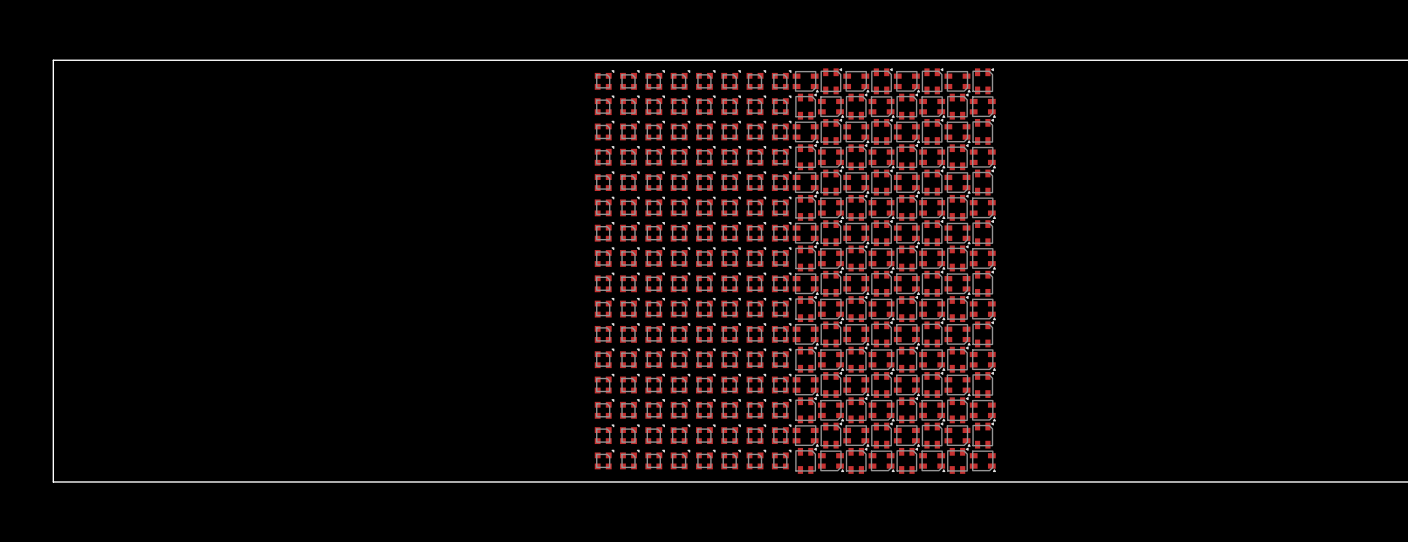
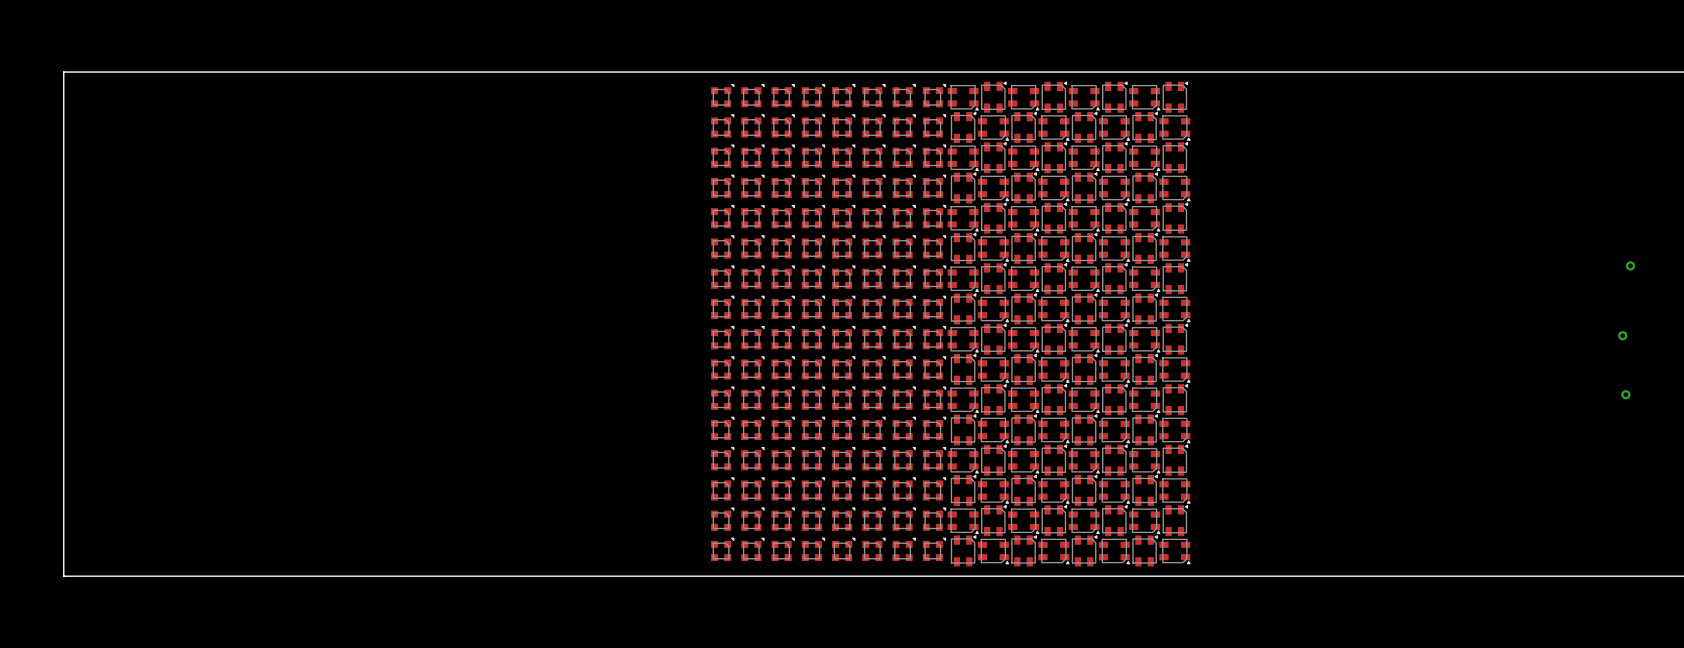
via: none -> (1630, 265)
via: none -> (1622, 335)
via: none -> (1625, 394)

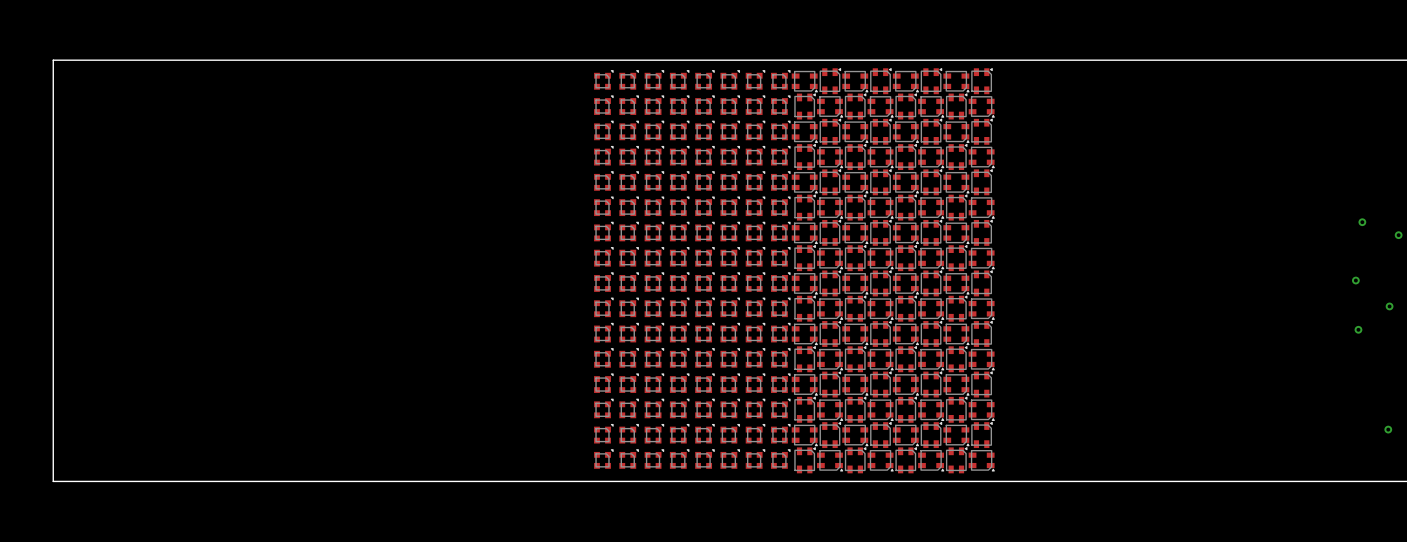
via: none -> (1398, 235)
via: none -> (1389, 306)
via: none -> (1388, 429)

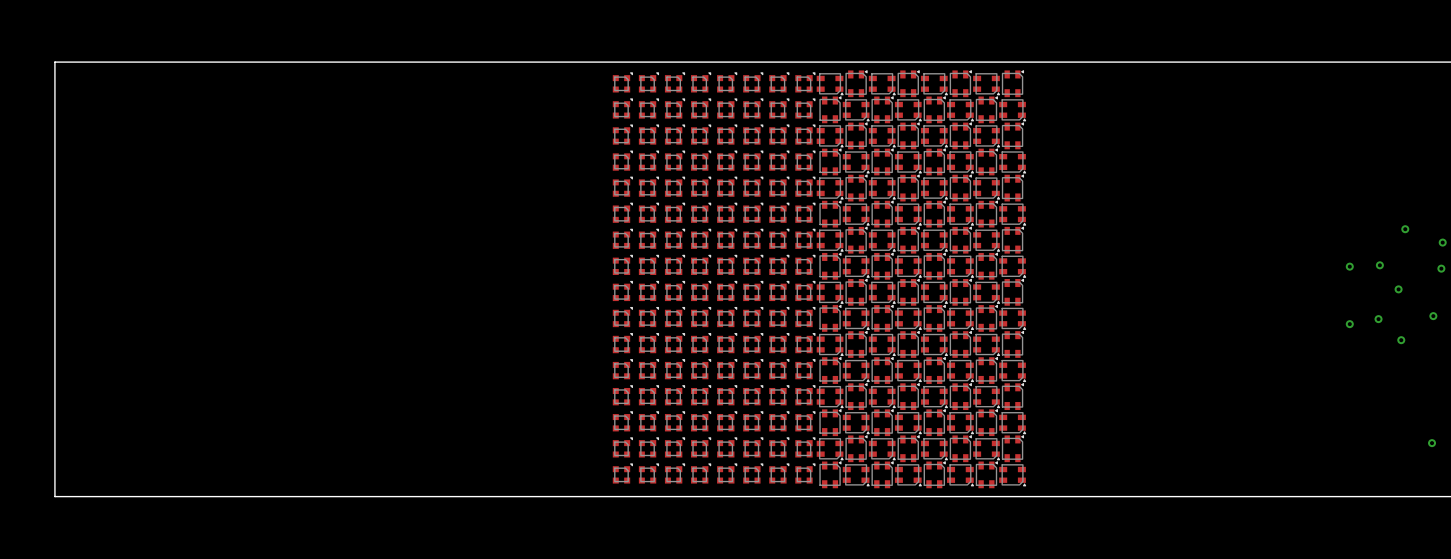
via: none -> (1379, 265)
via: none -> (1349, 266)
via: none -> (1441, 268)
via: none -> (1378, 319)
via: none -> (1349, 324)

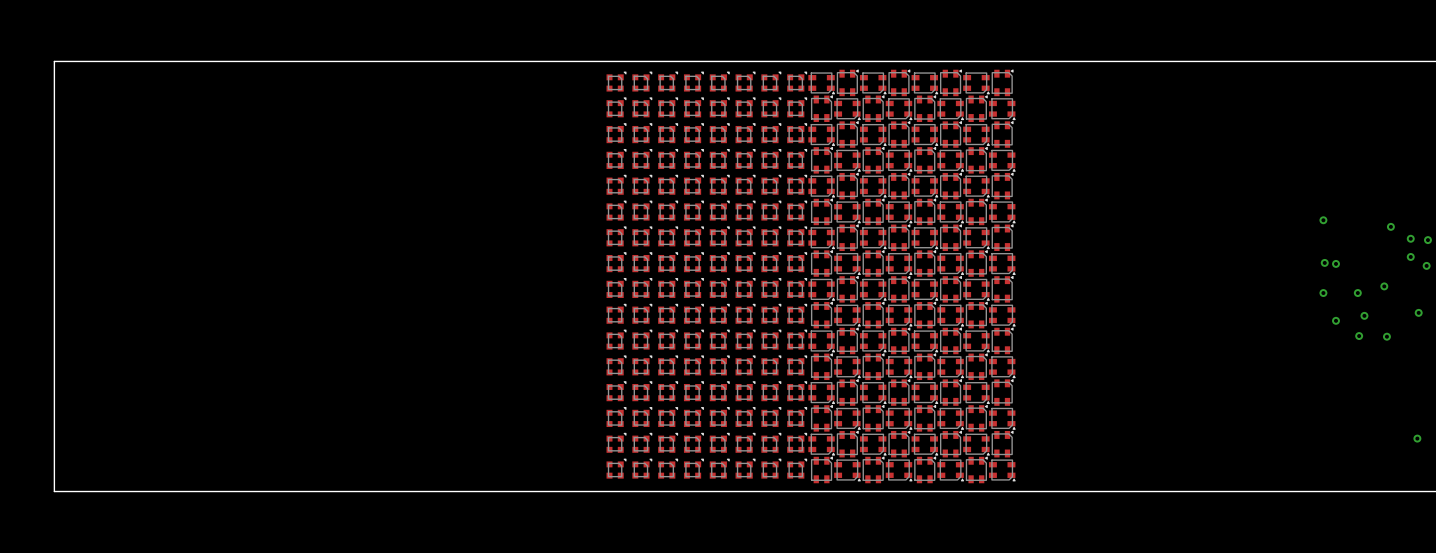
via: none -> (1323, 220)
via: none -> (1410, 238)
via: none -> (1410, 256)
via: none -> (1324, 262)
via: (1379, 265) -> none
via: none -> (1323, 293)
via: none -> (1357, 293)
via: none -> (1359, 336)

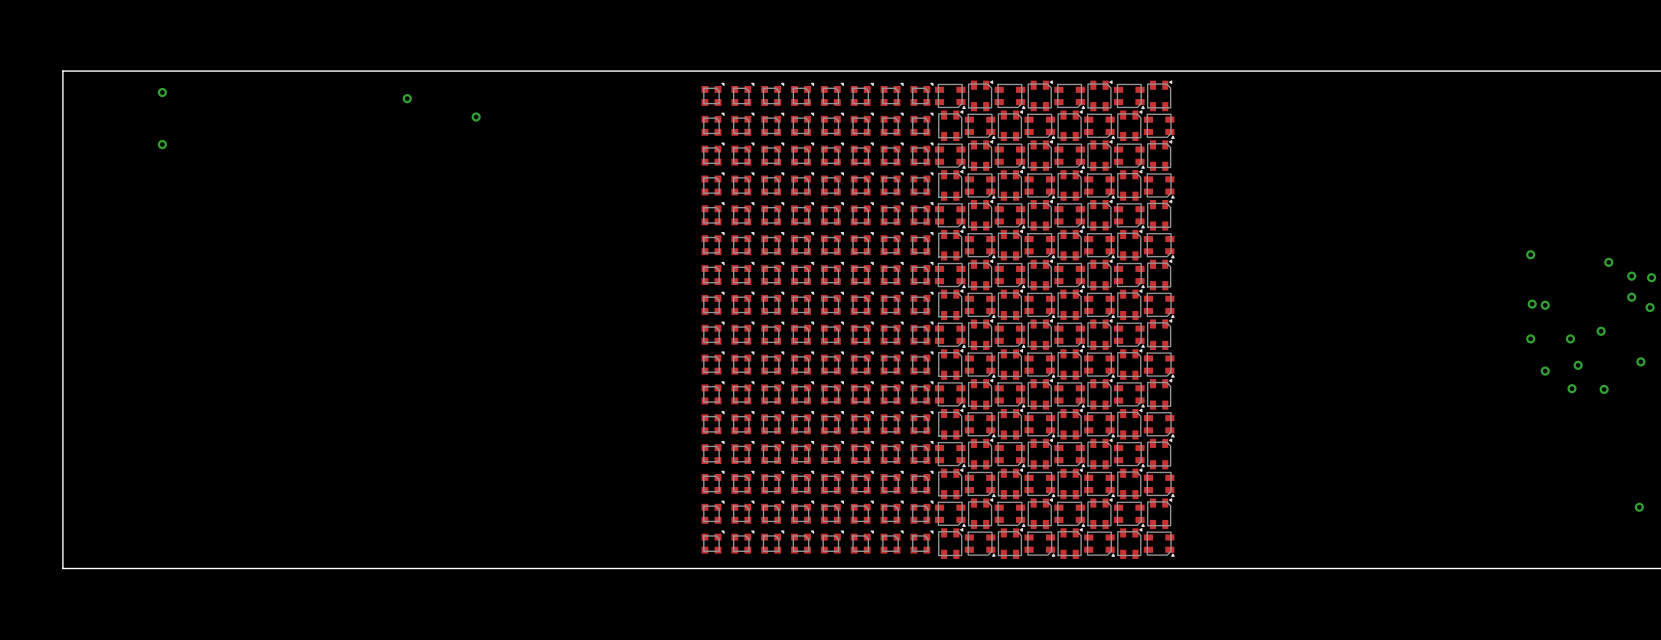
via: none -> (162, 92)
via: none -> (407, 98)
via: none -> (476, 116)
via: none -> (162, 144)

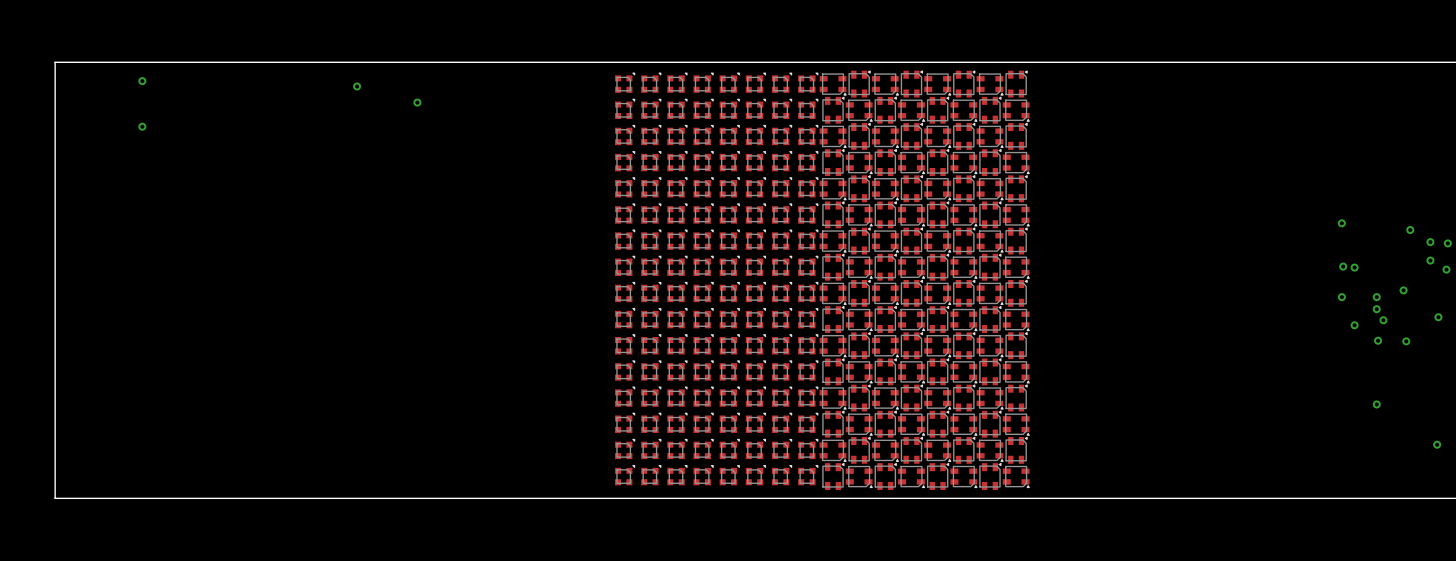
via: none -> (1376, 309)
via: none -> (1376, 404)

